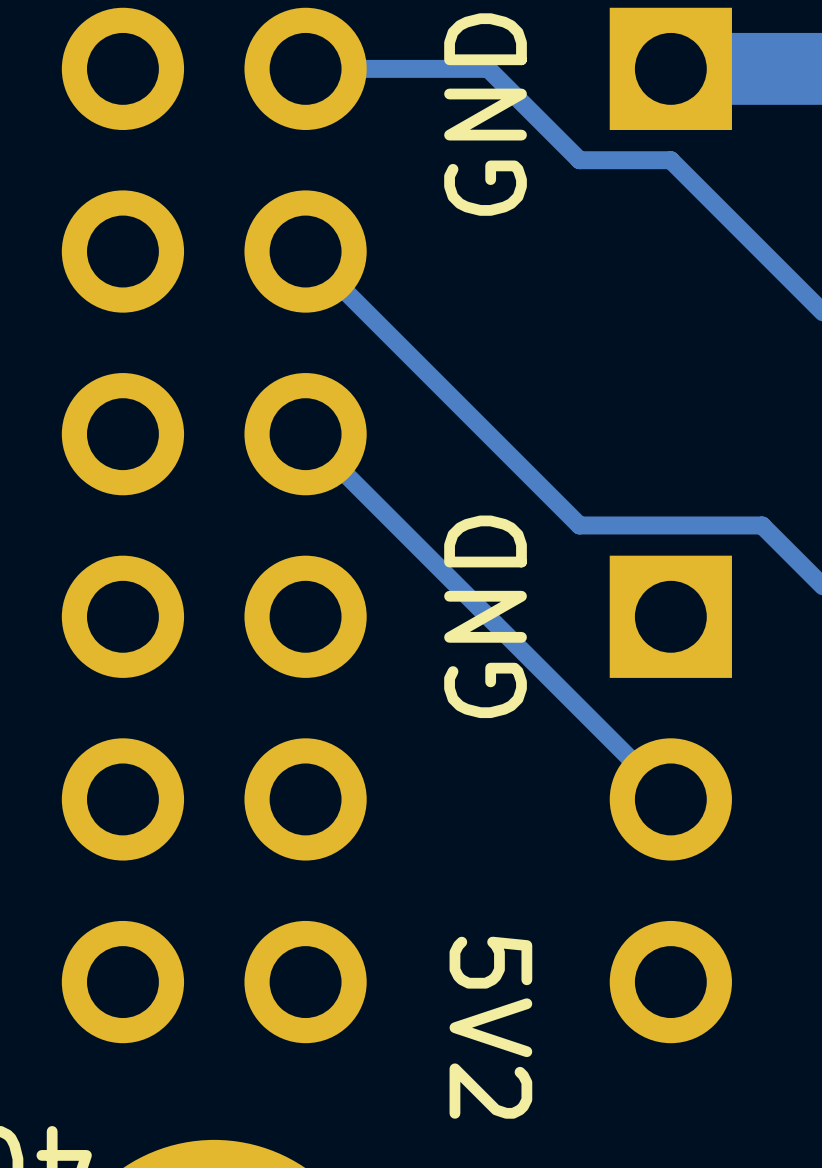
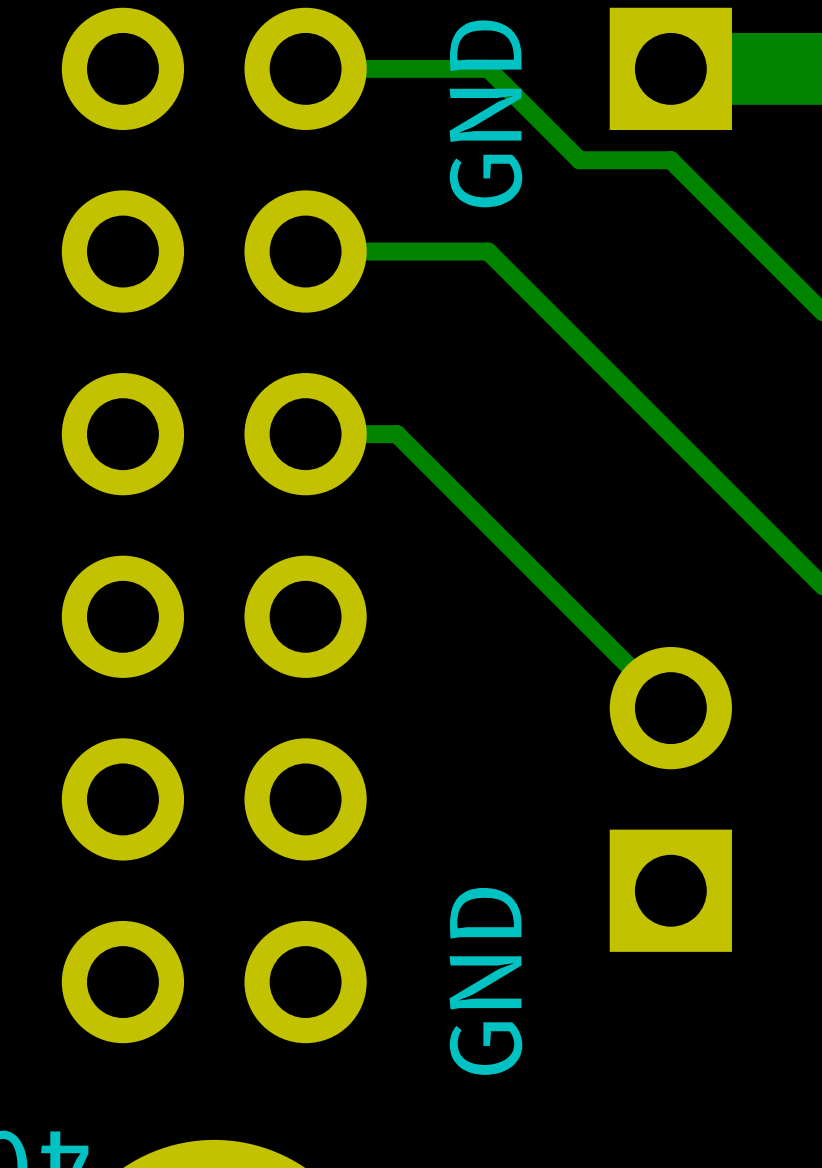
track: (305, 251) (579, 525) (762, 525) -> (305, 251) (488, 251) (762, 525)
track: (305, 434) (670, 799) -> (305, 434) (396, 434) (670, 708)
part footprint: [609, 555, 732, 1044] -> [609, 646, 732, 952]
text position: GND (485, 616) -> GND (485, 981)
text: 5V2 (490, 1027) -> none

